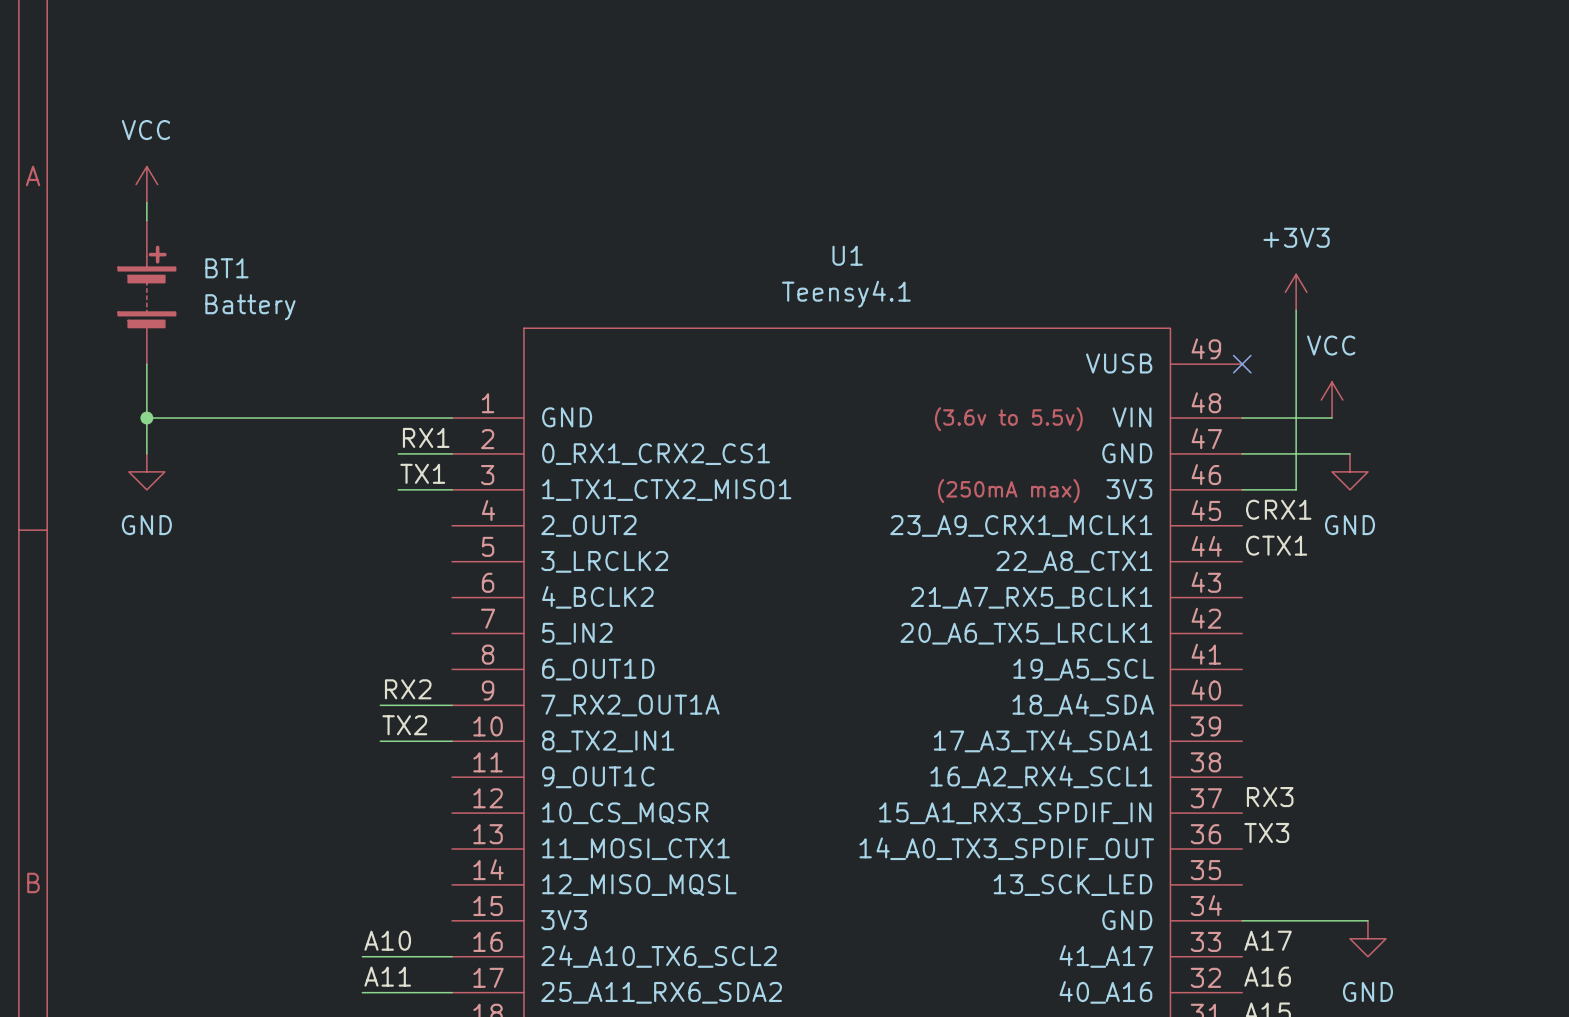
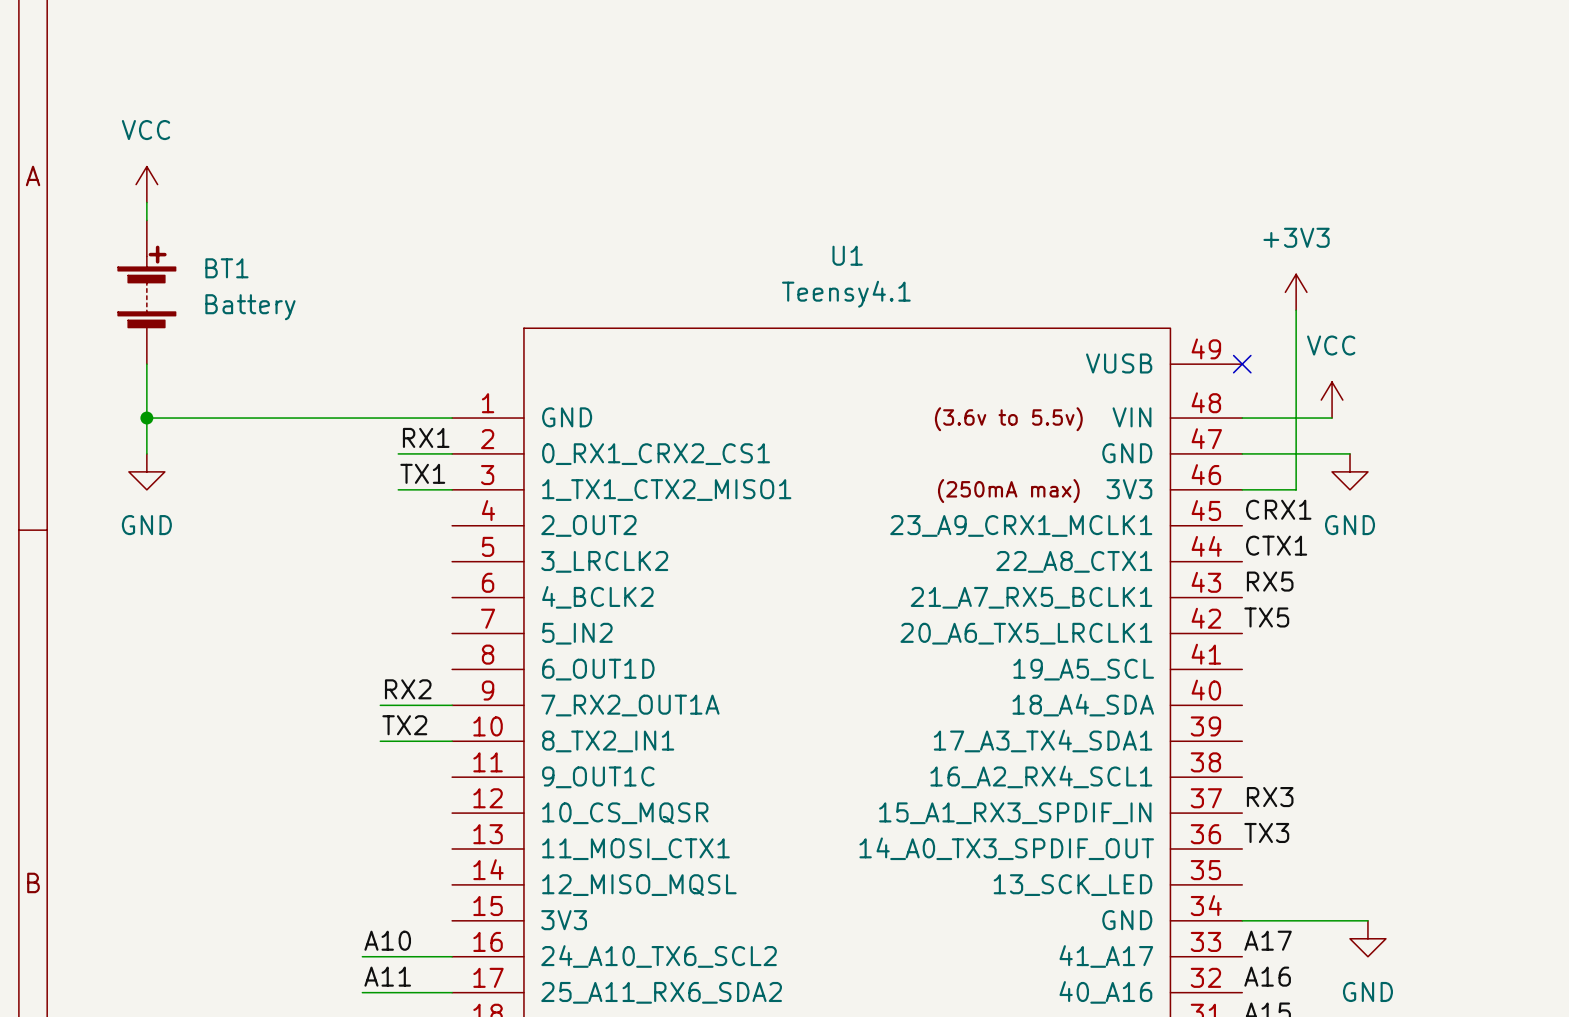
label: none -> RX5 (1270, 581)
label: none -> TX5 (1266, 617)

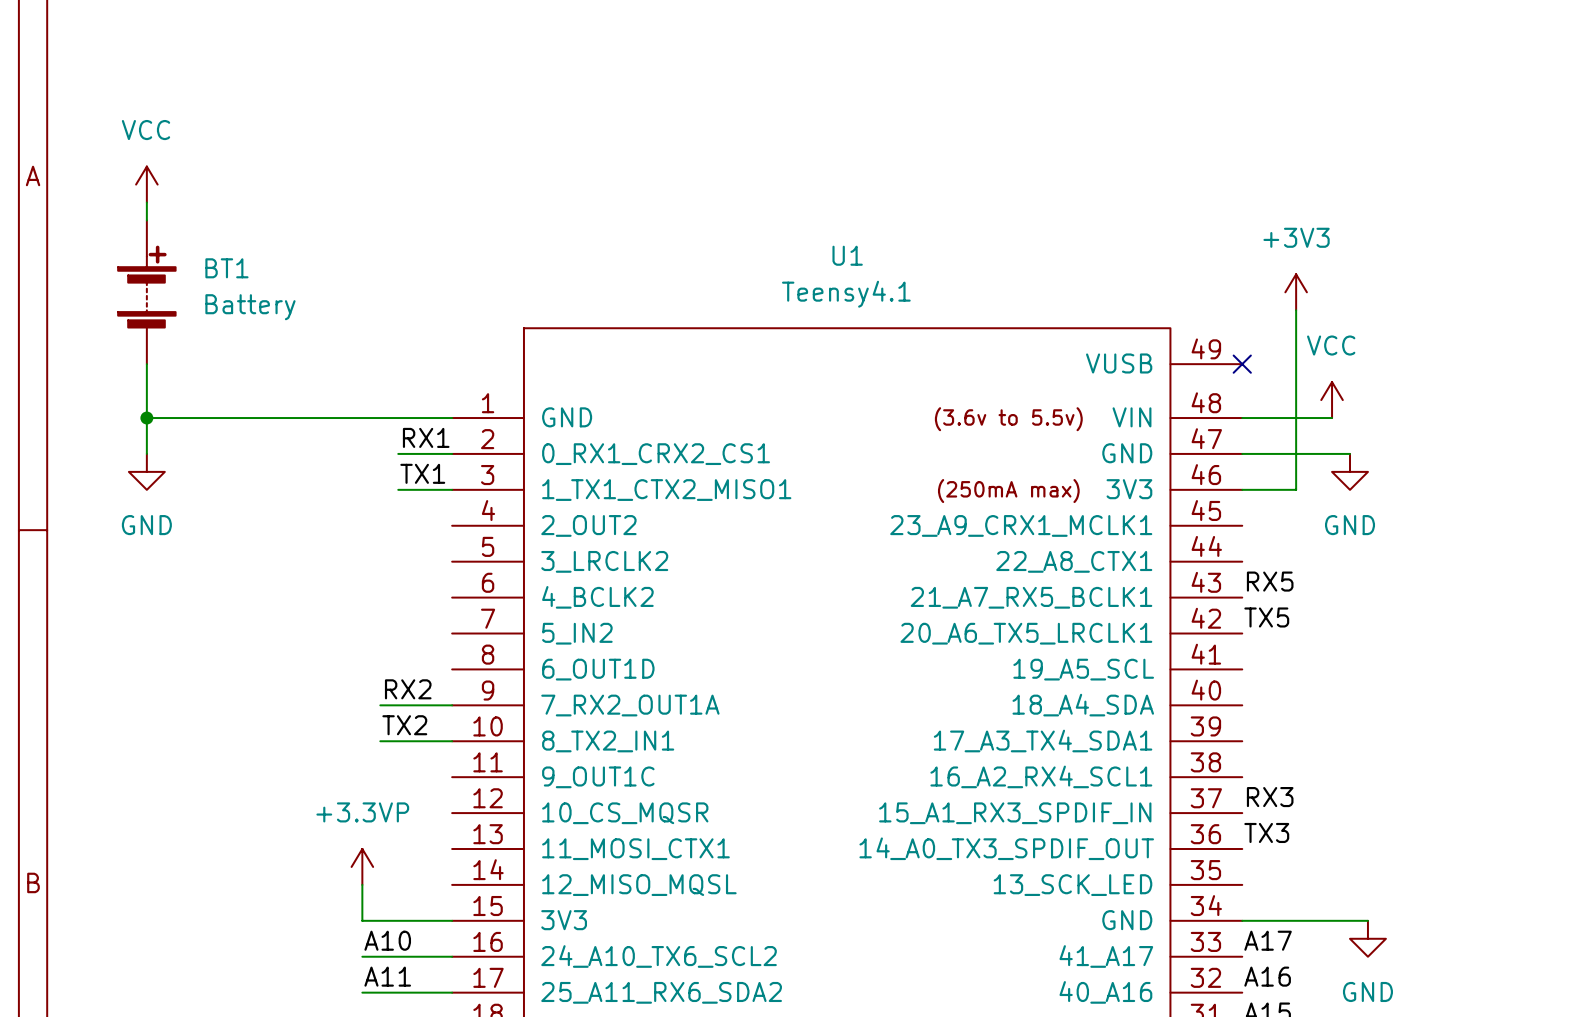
label: CRX1 (1278, 509) -> none
label: CTX1 (1276, 545) -> none
power symbol: none -> +3.3VP (362, 866)
wire: none -> (362, 884) (362, 920) (452, 920)

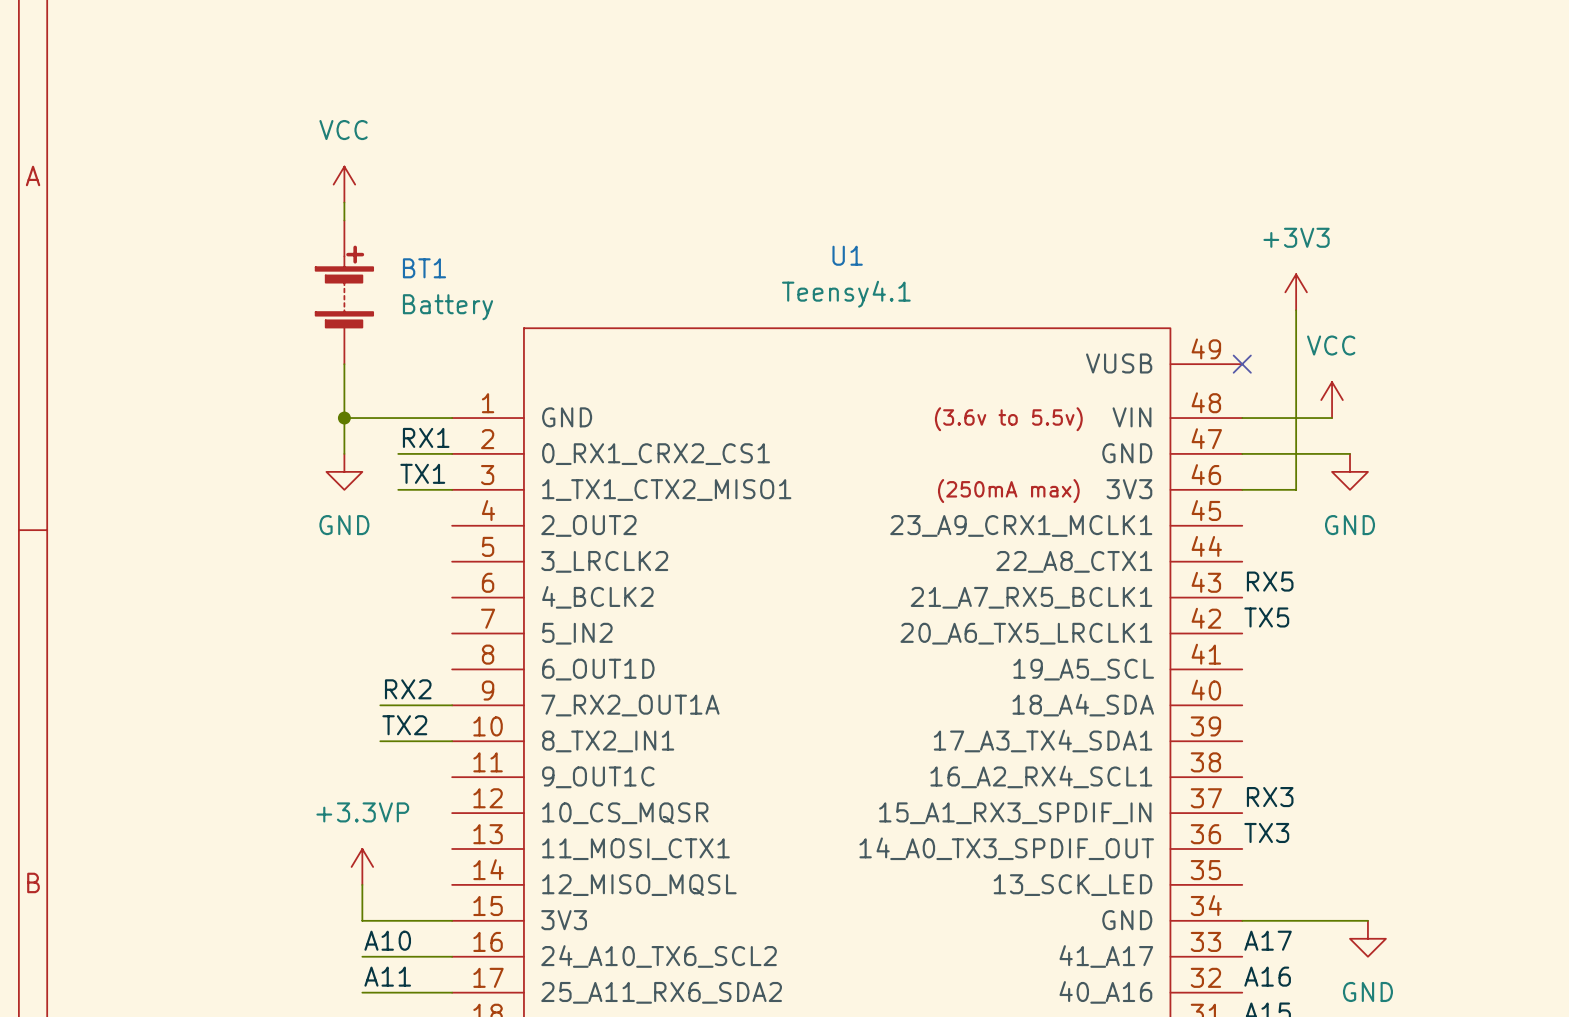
power symbol position: VCC (146, 184) -> VCC (344, 184)
wire: (146, 202) (146, 220) -> (344, 202) (344, 220)
BT1 position: (146, 292) -> (344, 292)
wire: (146, 364) (146, 453) -> (344, 364) (344, 453)
wire: (146, 418) (344, 418) -> none
junction: (146, 418) -> none
junction: none -> (344, 418)
power symbol position: GND (146, 471) -> GND (344, 471)

